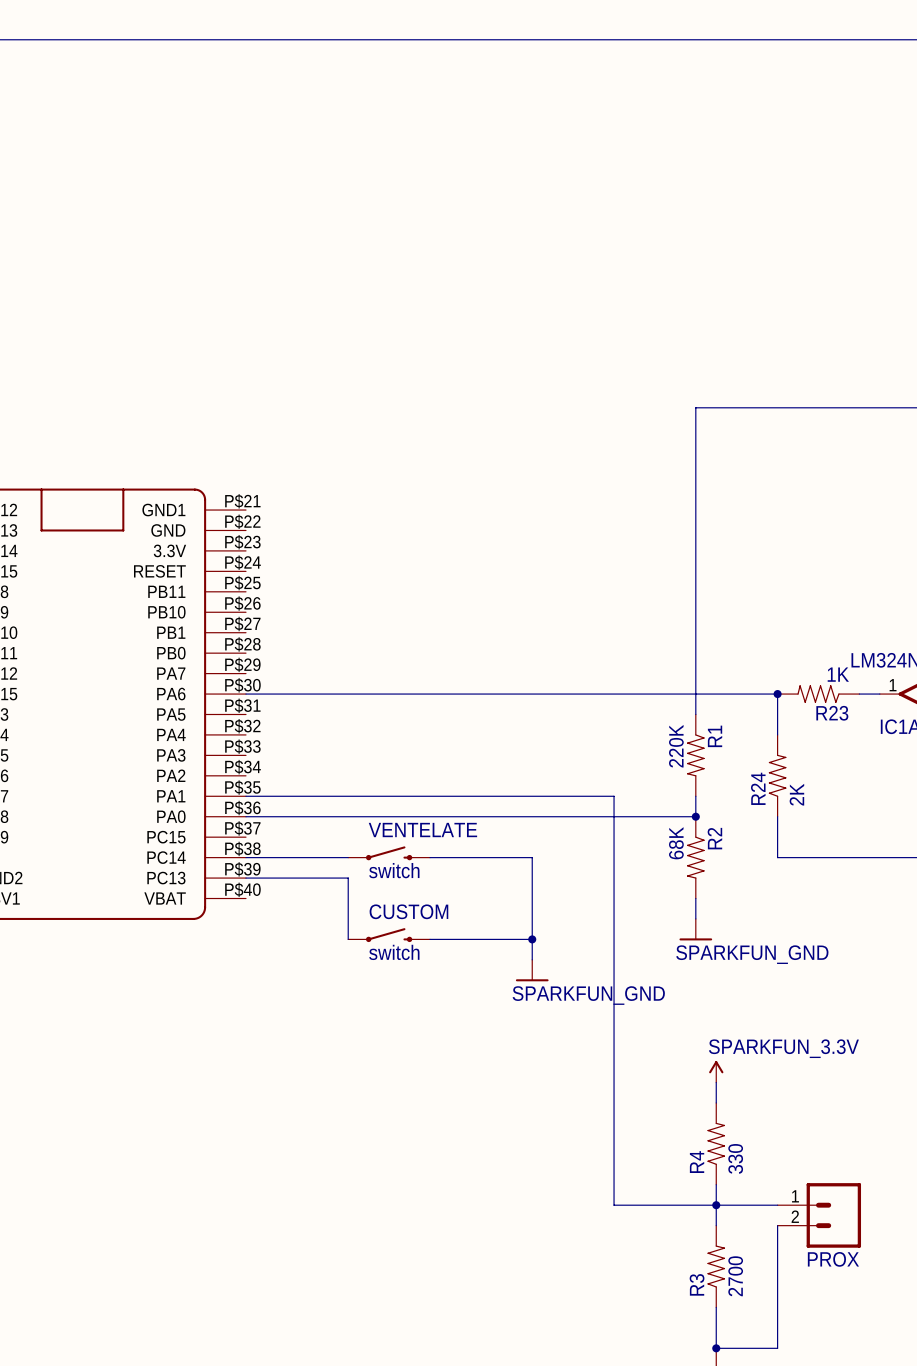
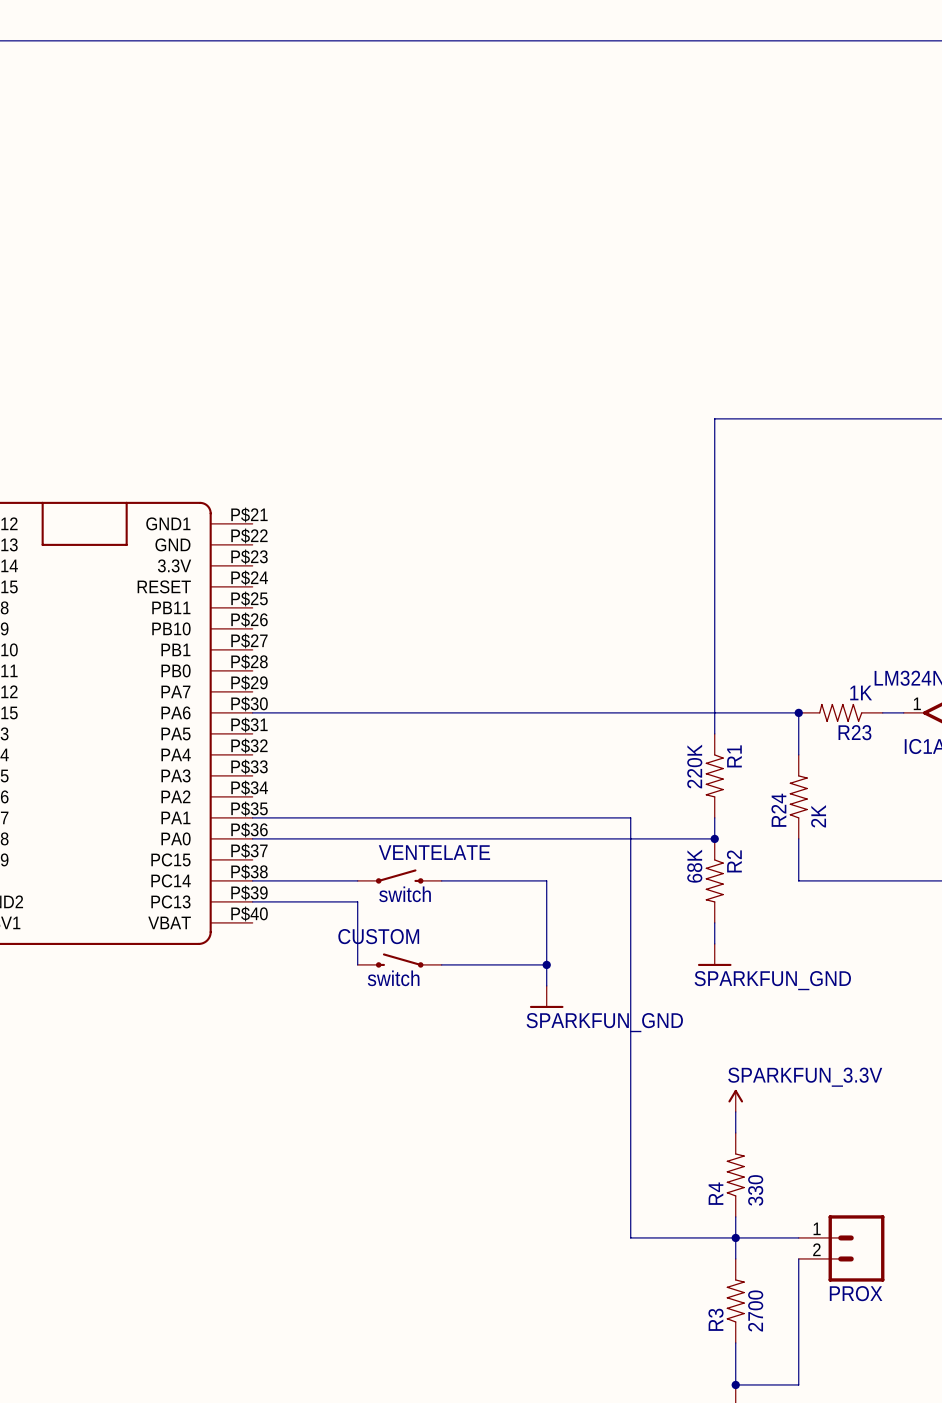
CUSTOM flip: as is (389, 935) -> left-right (399, 960)

